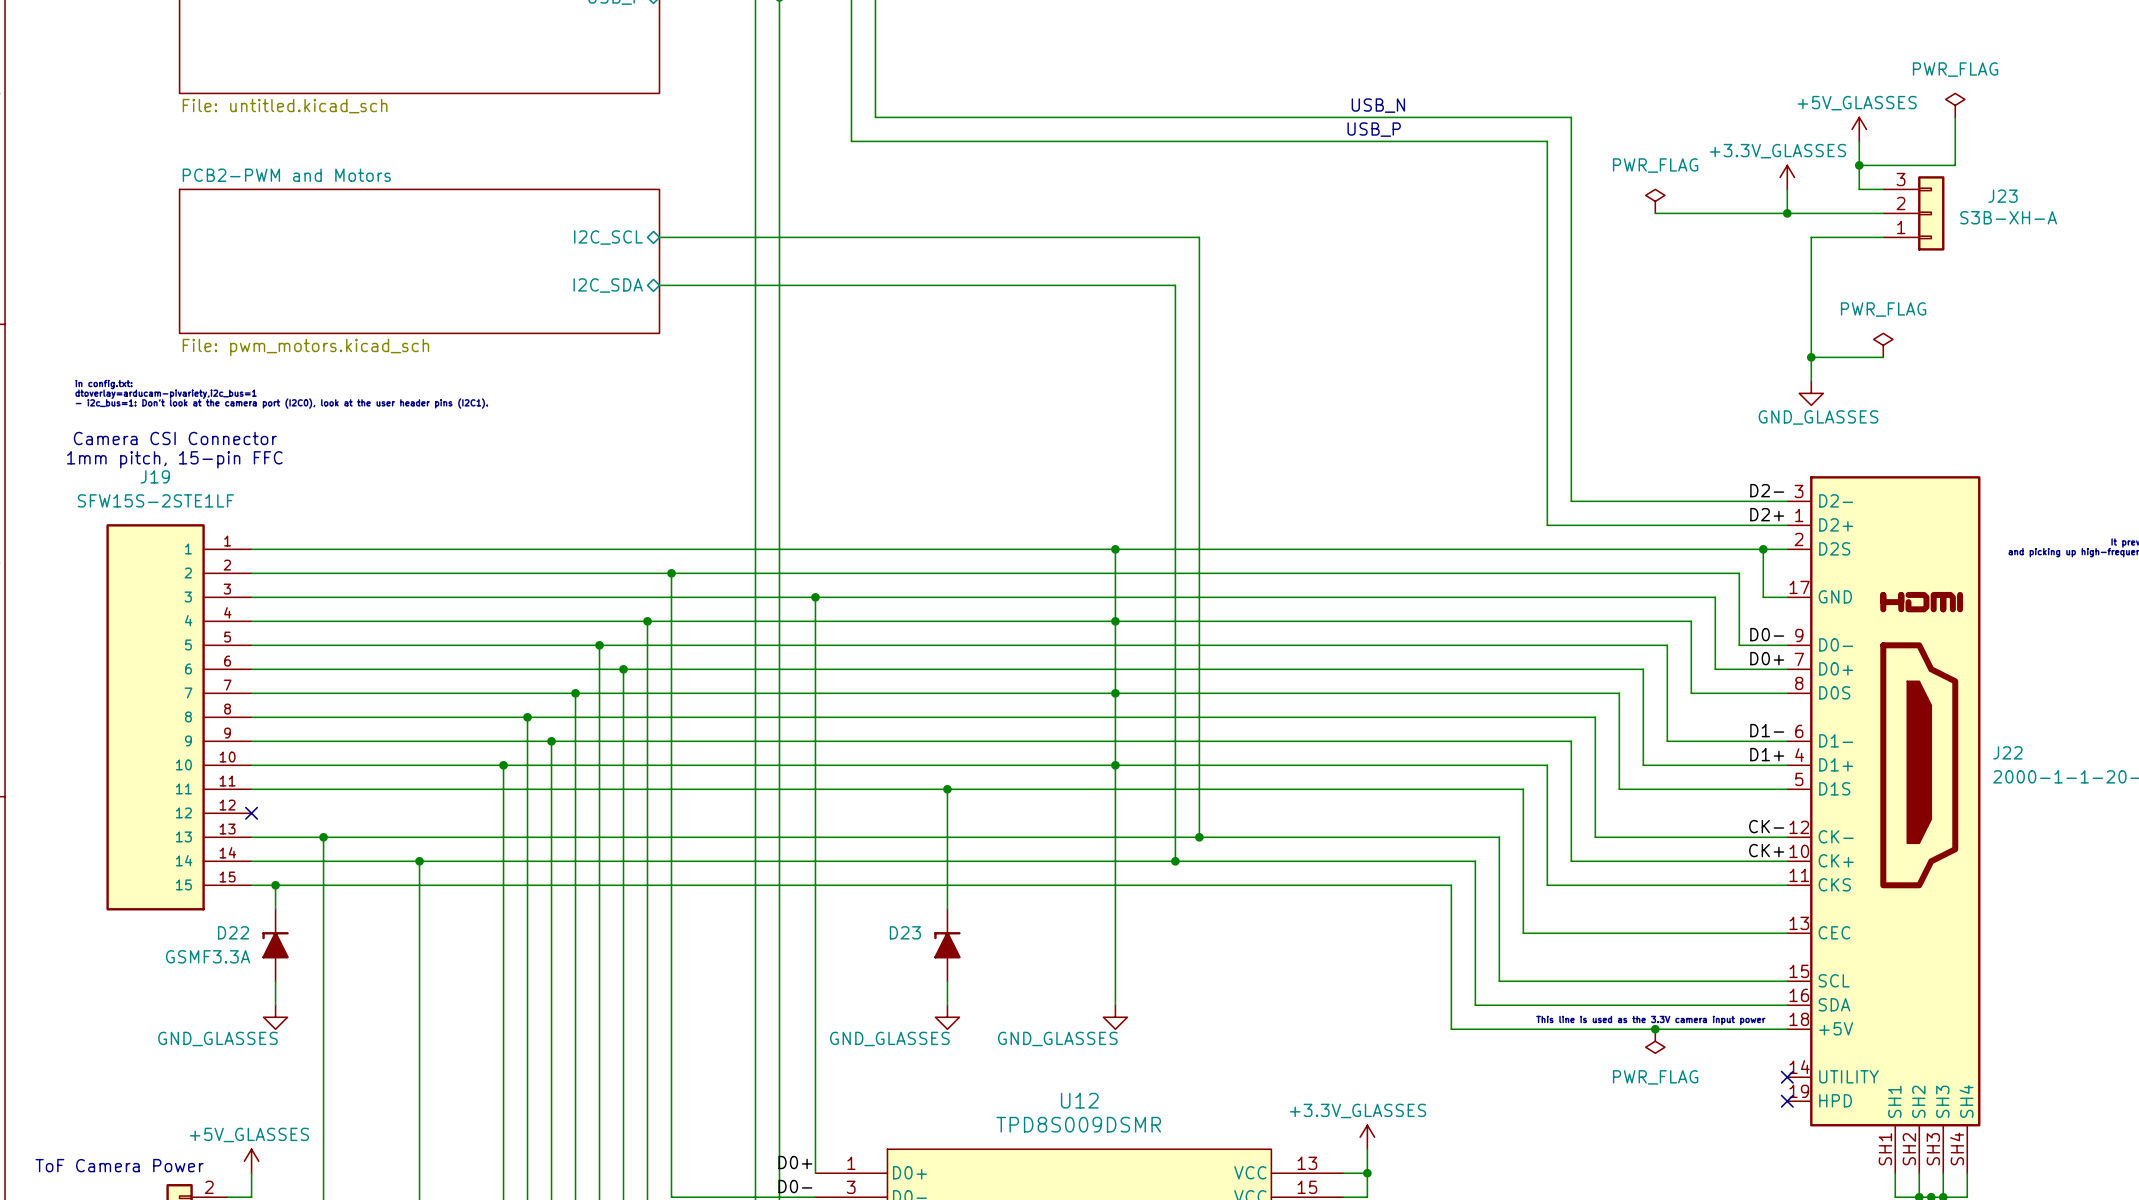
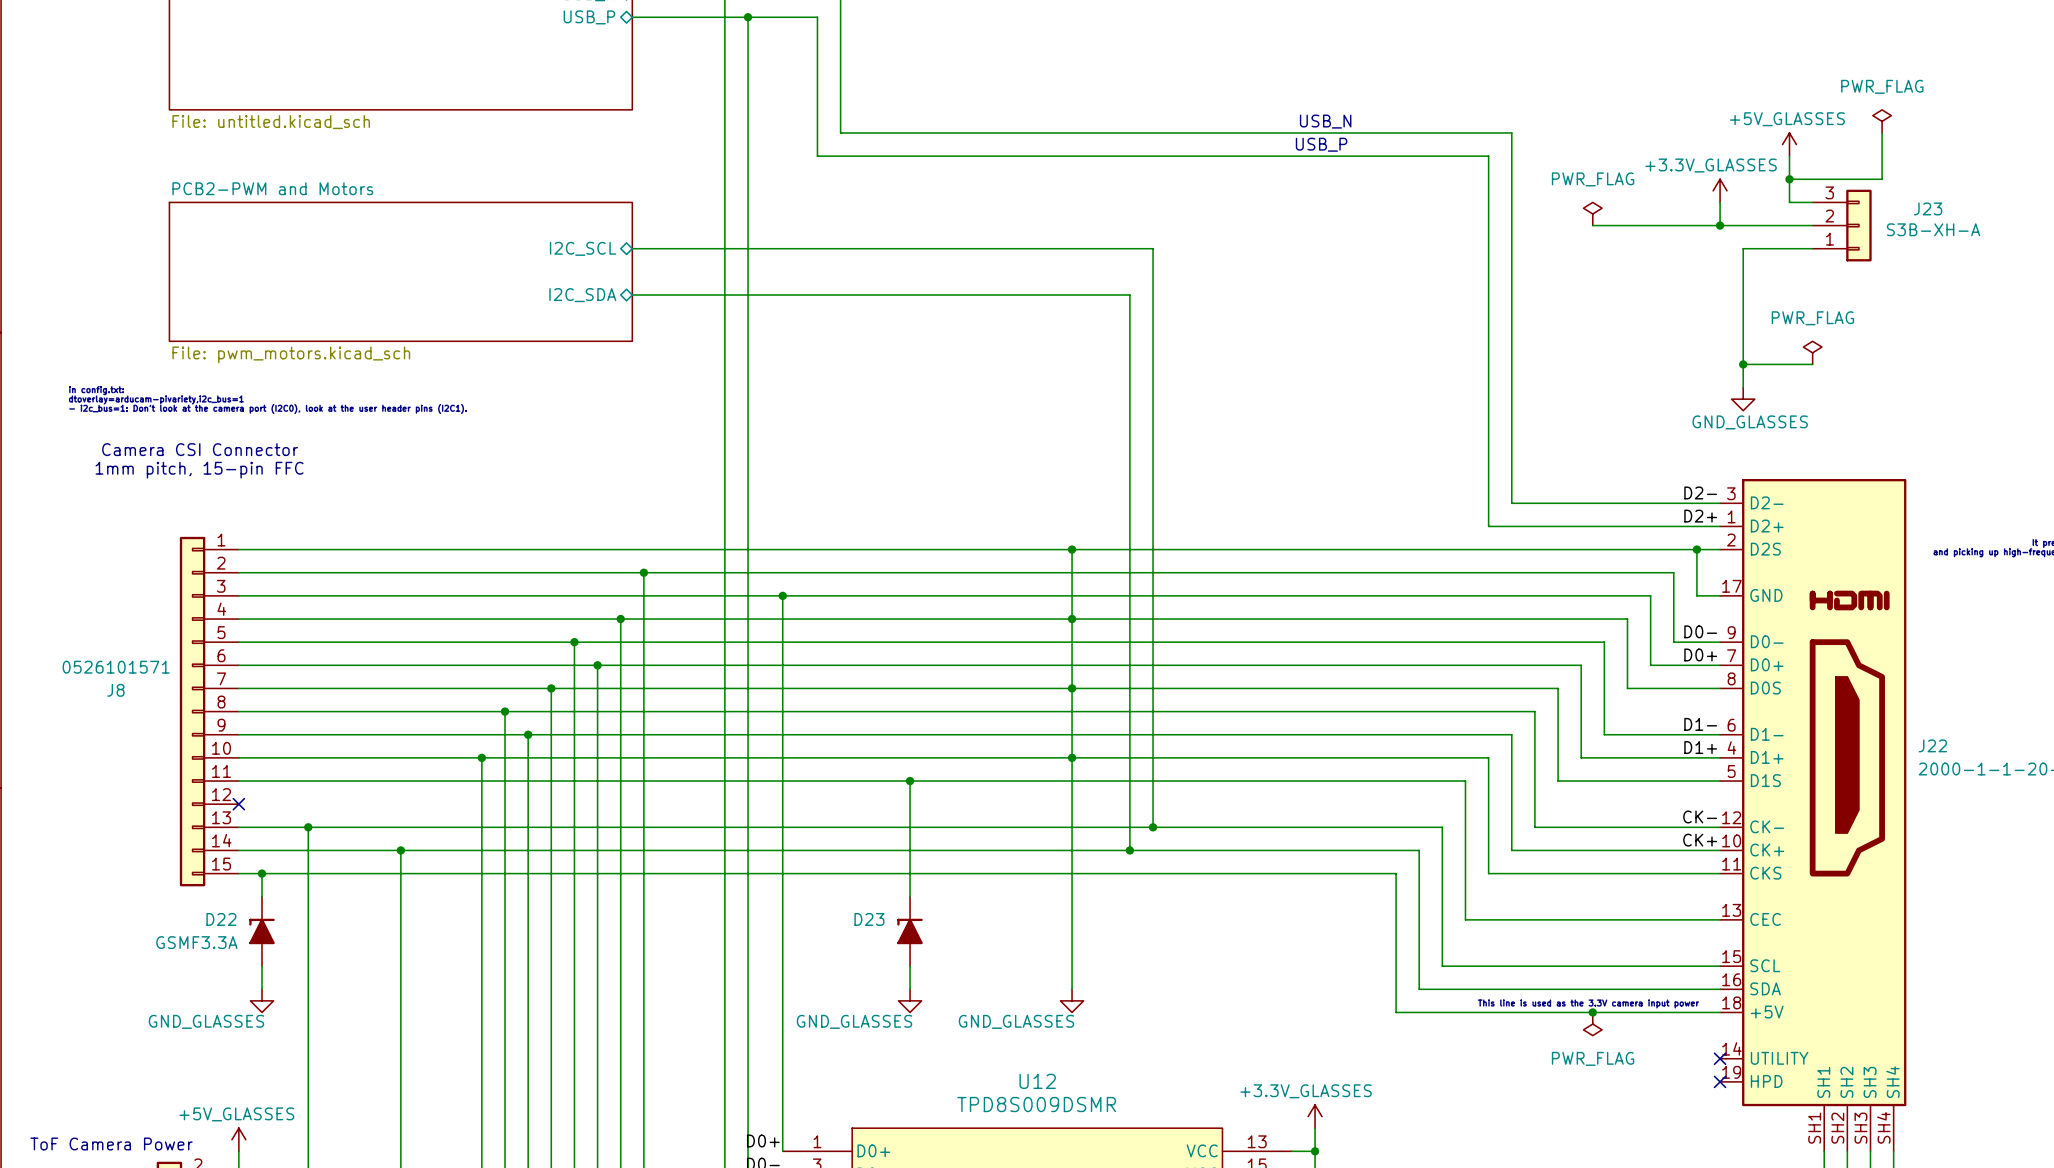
text position: Camera CSI Connector (175, 438) -> Camera CSI Connector (200, 449)
text position: 1mm pitch, 15-pin FFC (174, 459) -> 1mm pitch, 15-pin FFC (199, 470)
J19: SFW15S-2STE1LF (178, 717) -> none
J8: none -> 0526101571 (209, 711)

